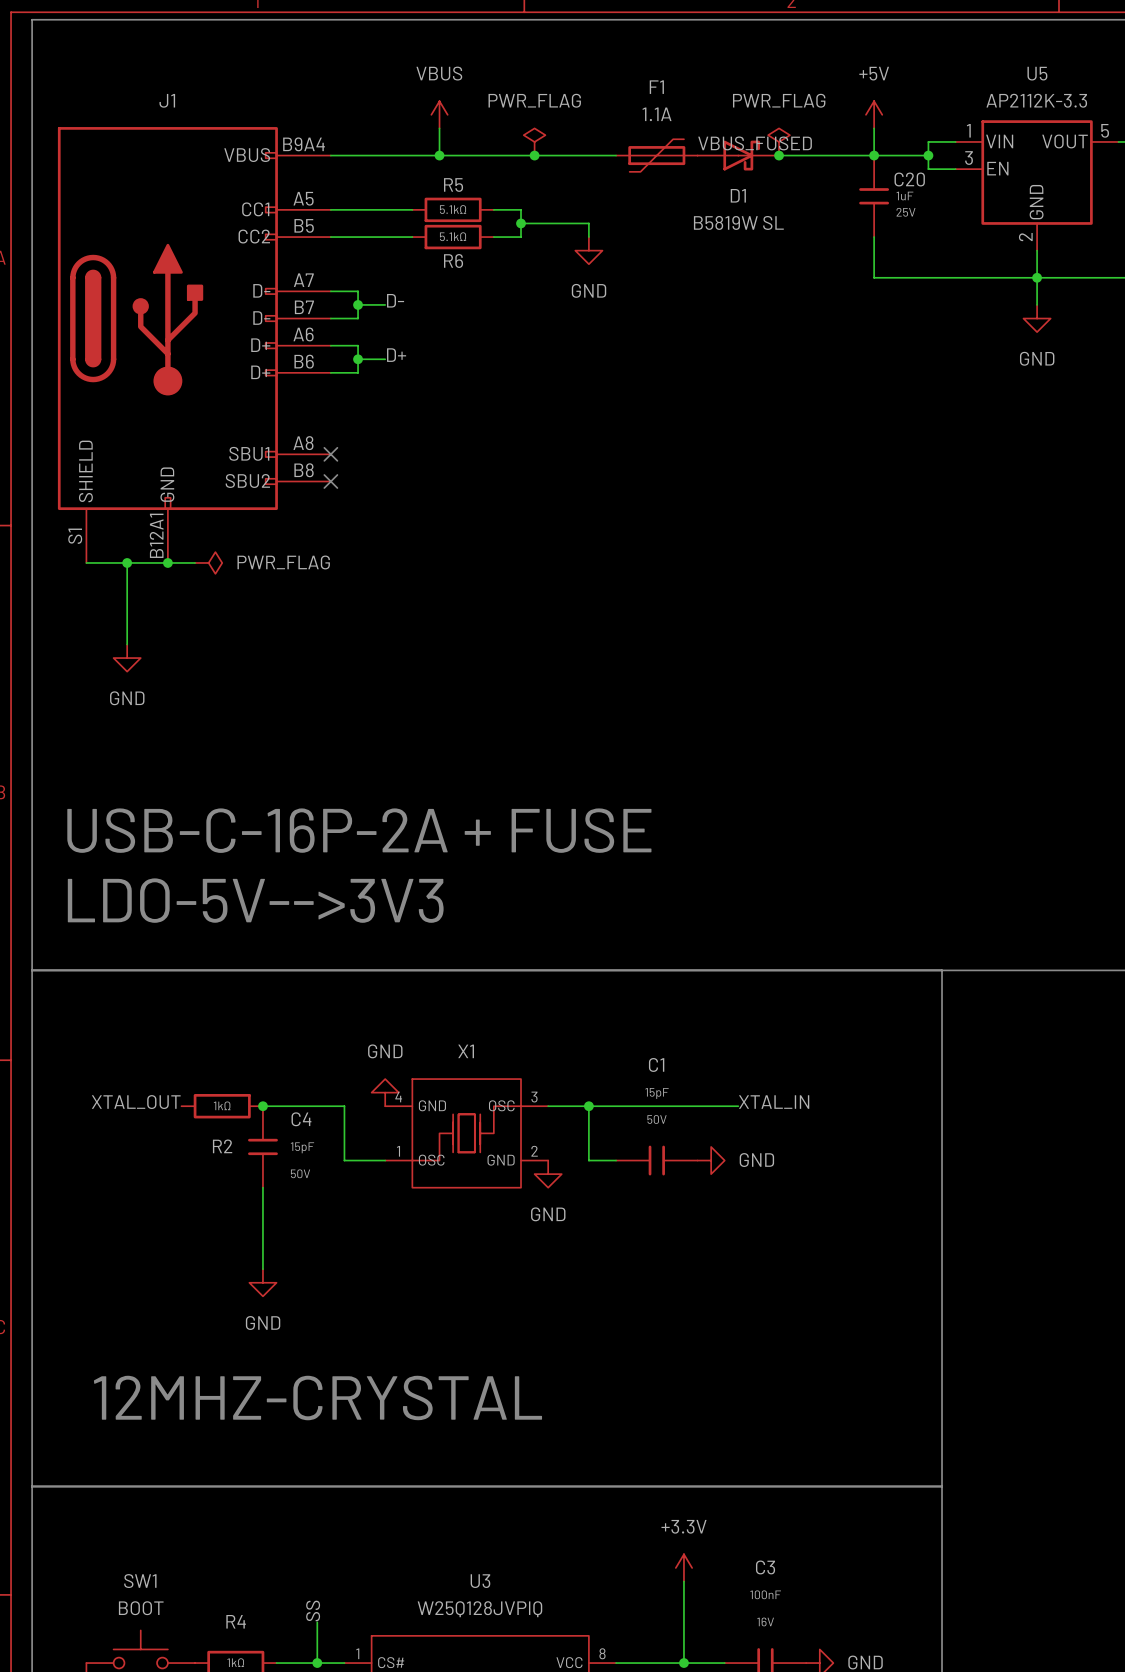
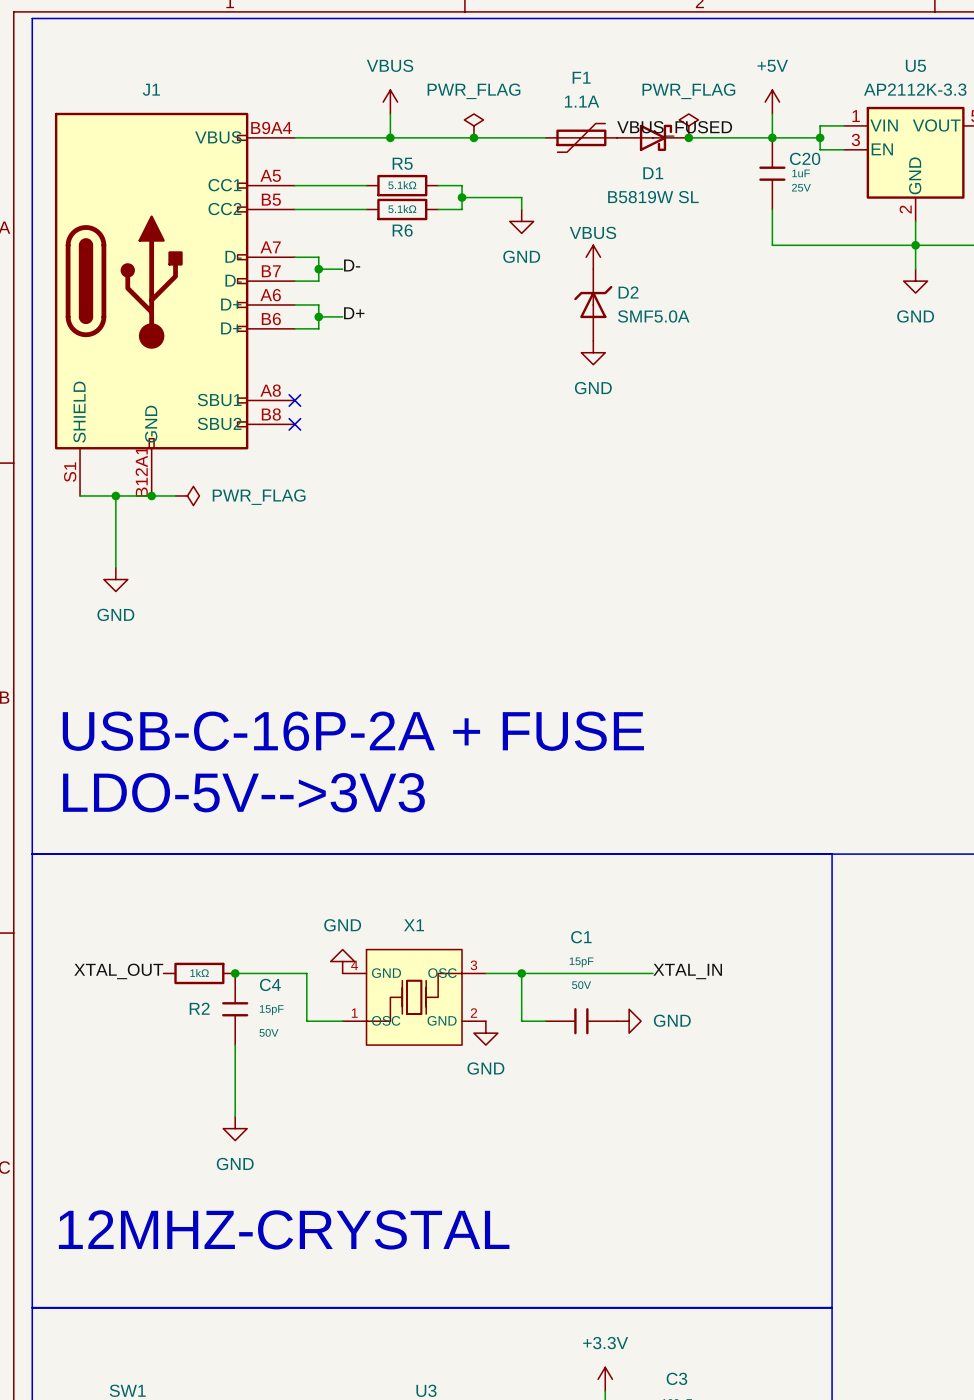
power symbol: none -> VBUS (593, 257)
D2: none -> SMF5.0A (593, 304)
power symbol: none -> GND (593, 352)

